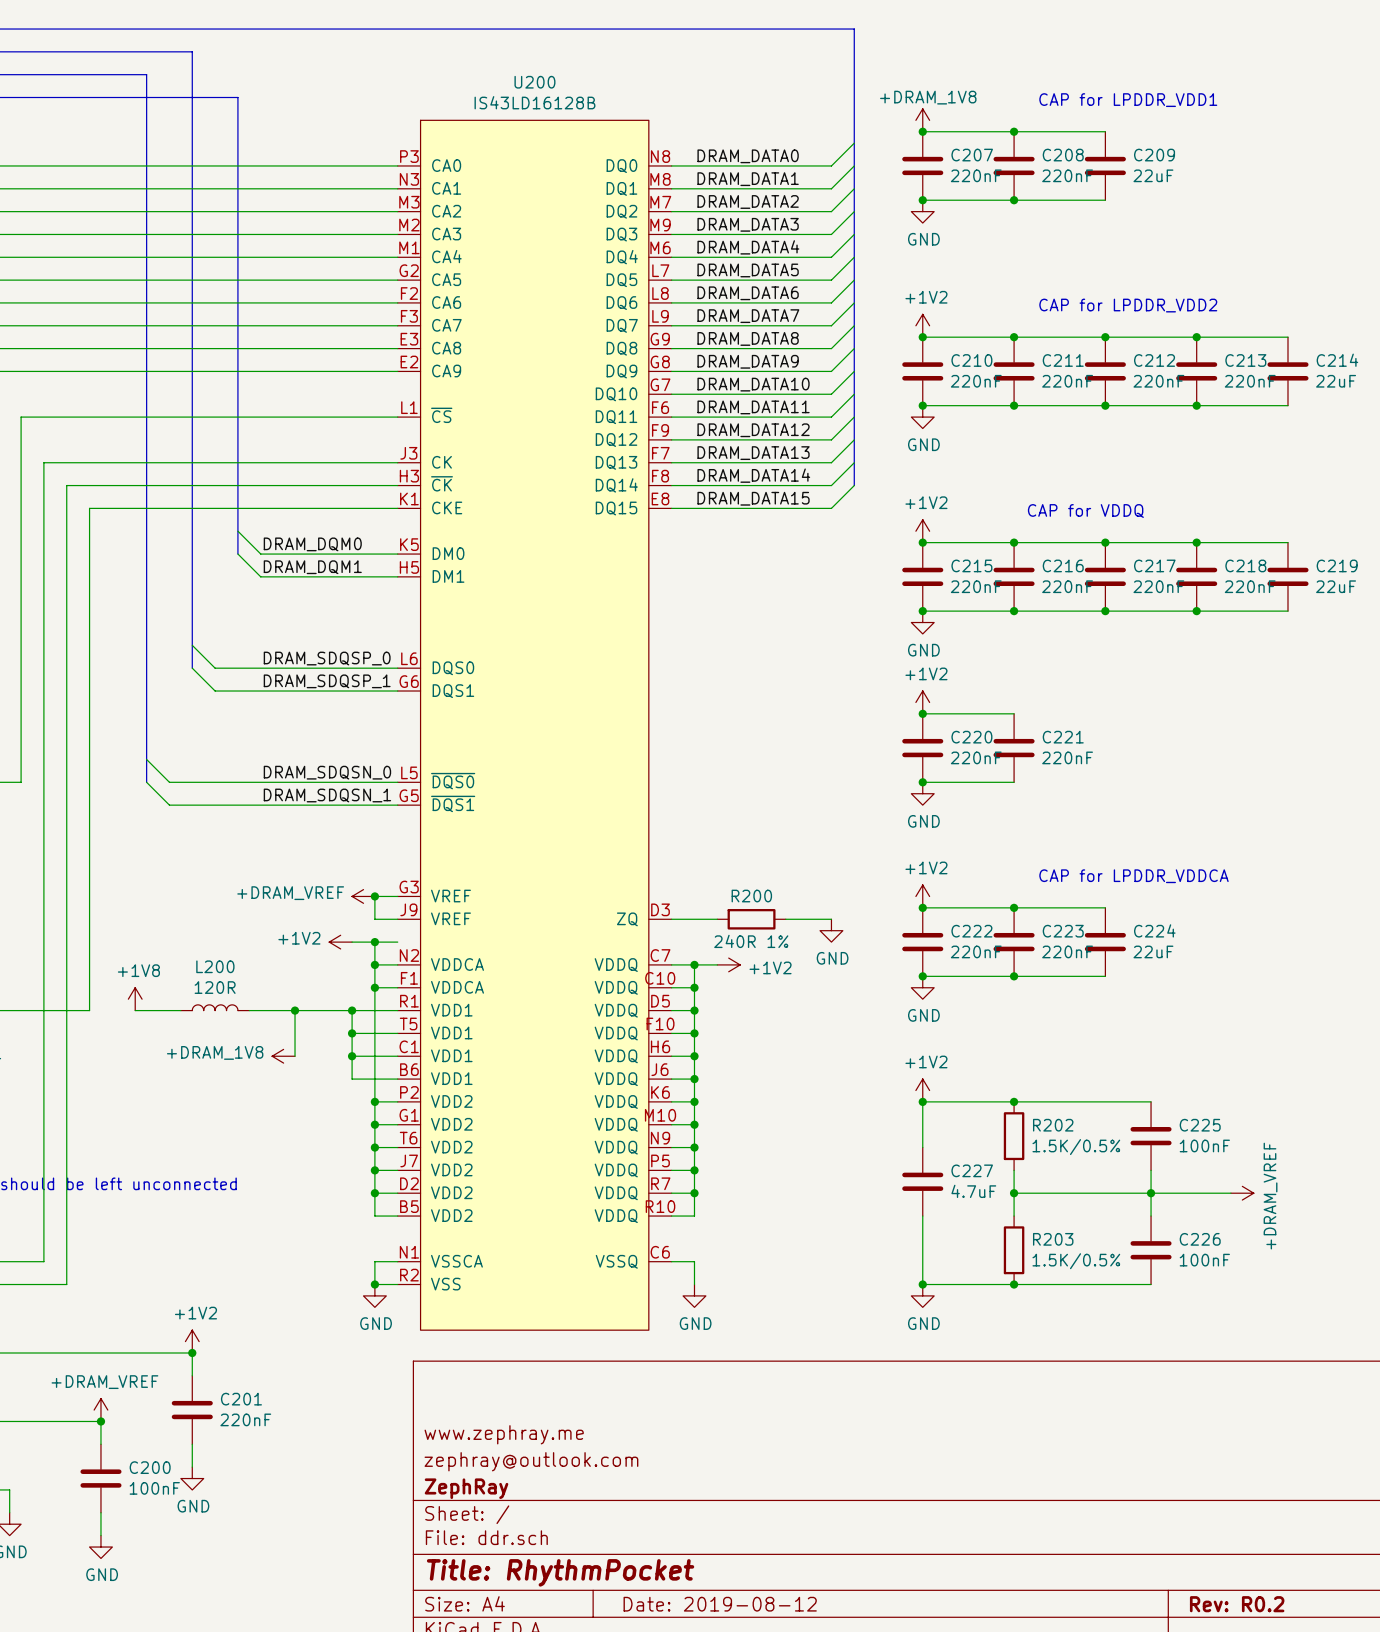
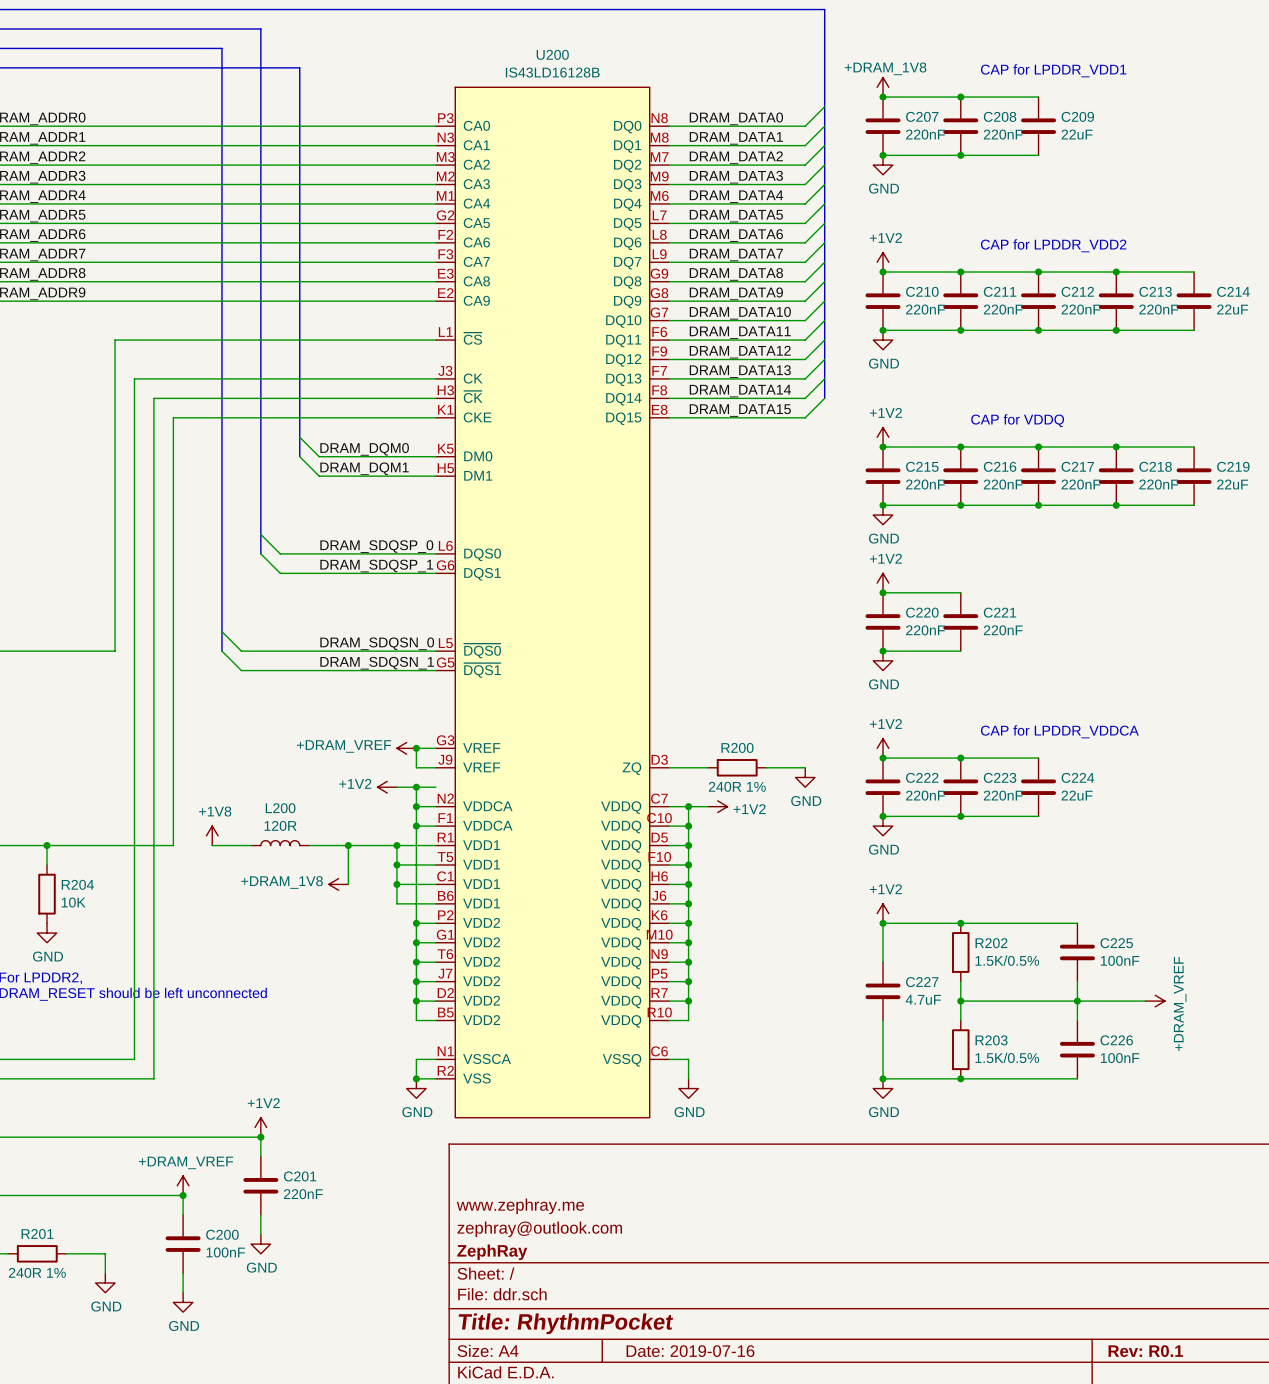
title block: Date: 2019-08-12 (720, 1604) -> Date: 2019-07-16 (690, 1351)
title block: Rev: R0.2 (1237, 1604) -> Rev: R0.1 (1145, 1351)

